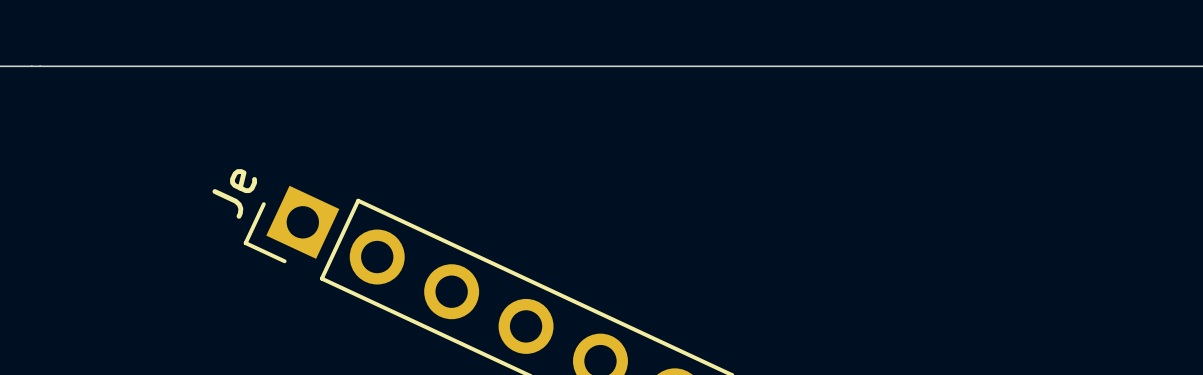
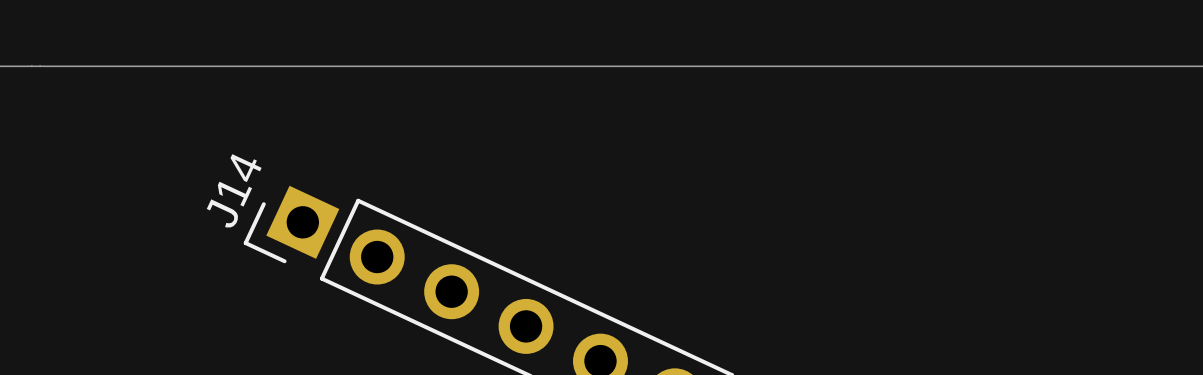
Je name: Je (234, 193) -> J14 (234, 191)

